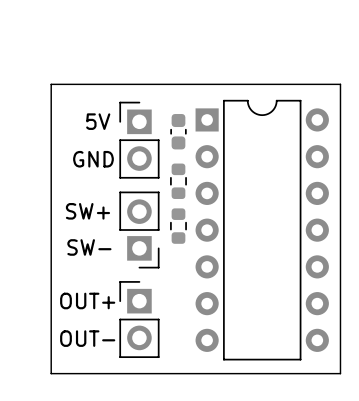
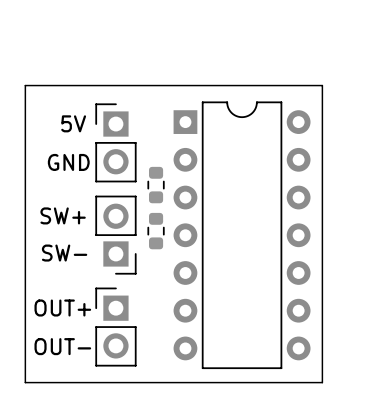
part: (178, 131) -> none

